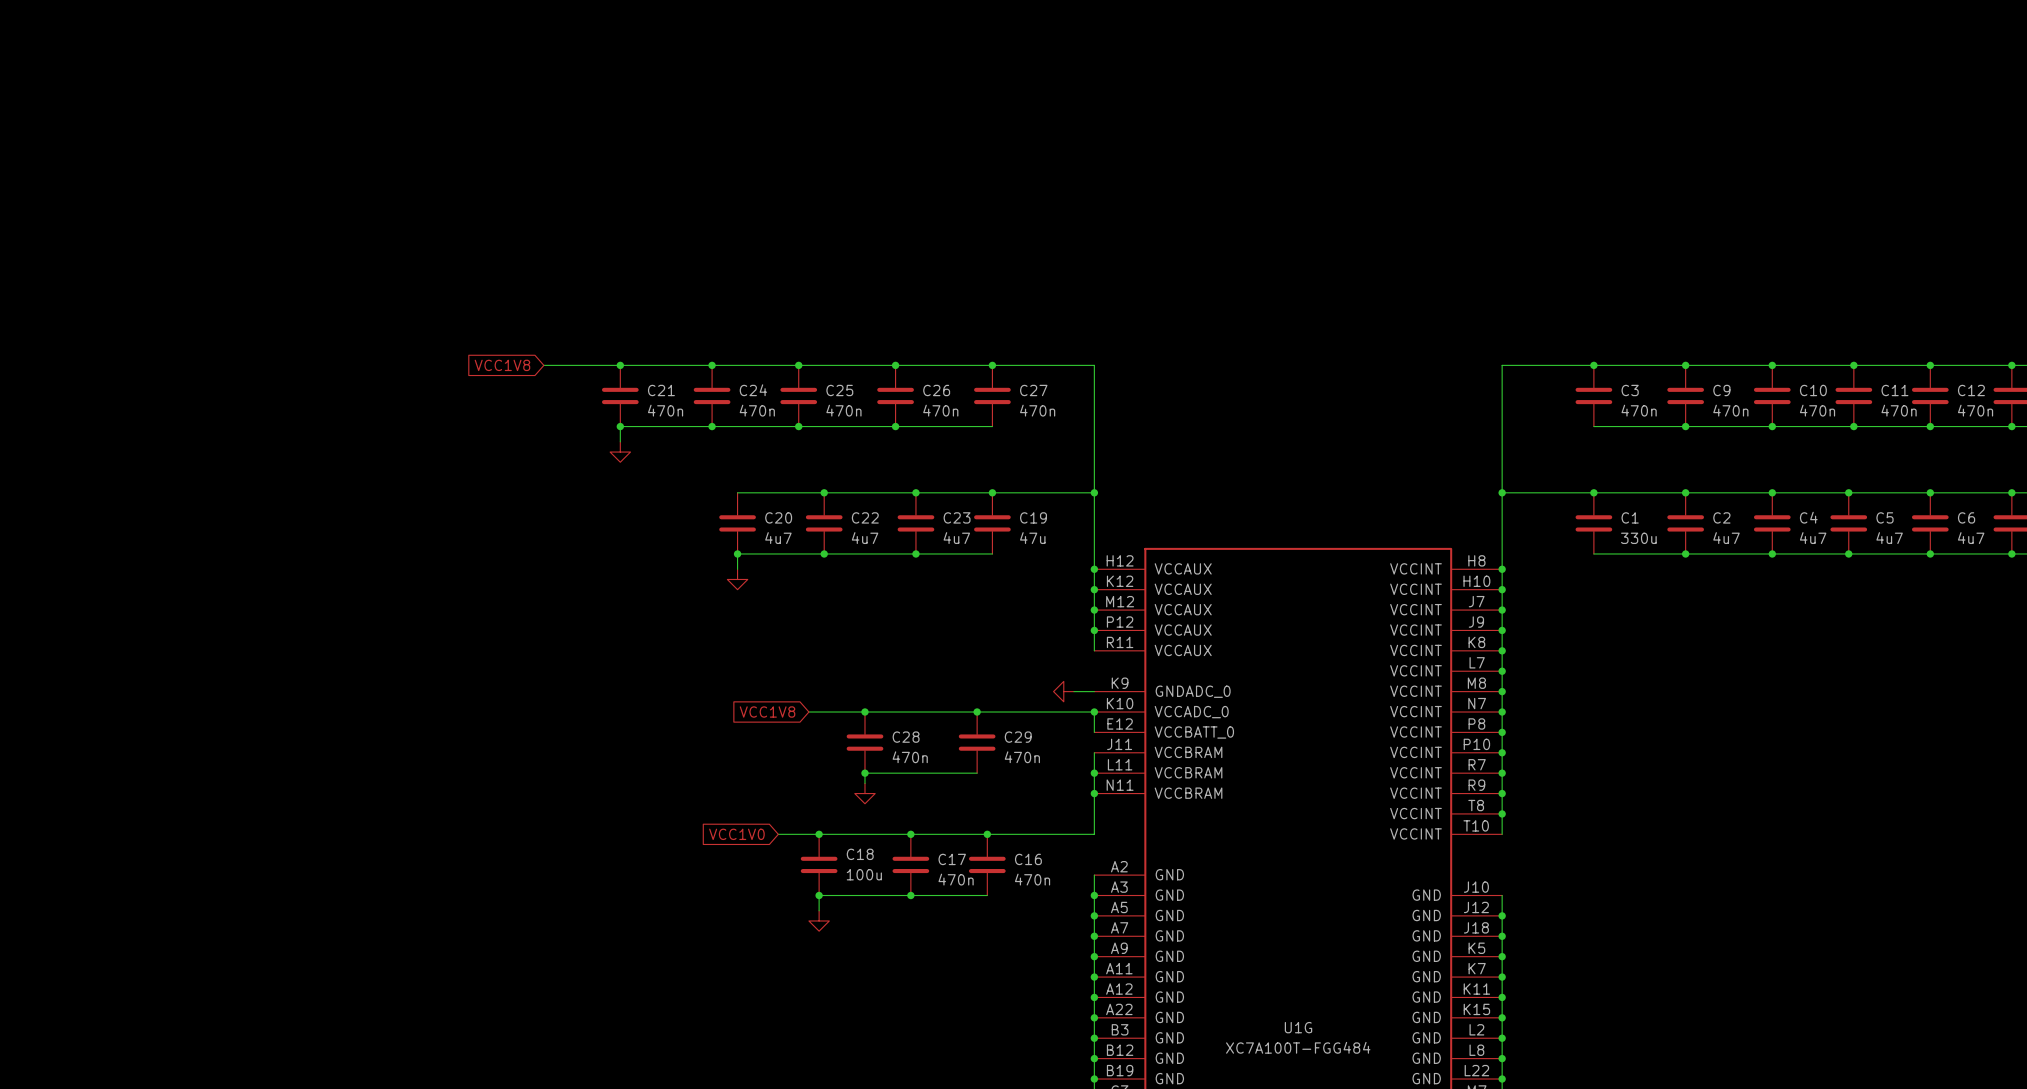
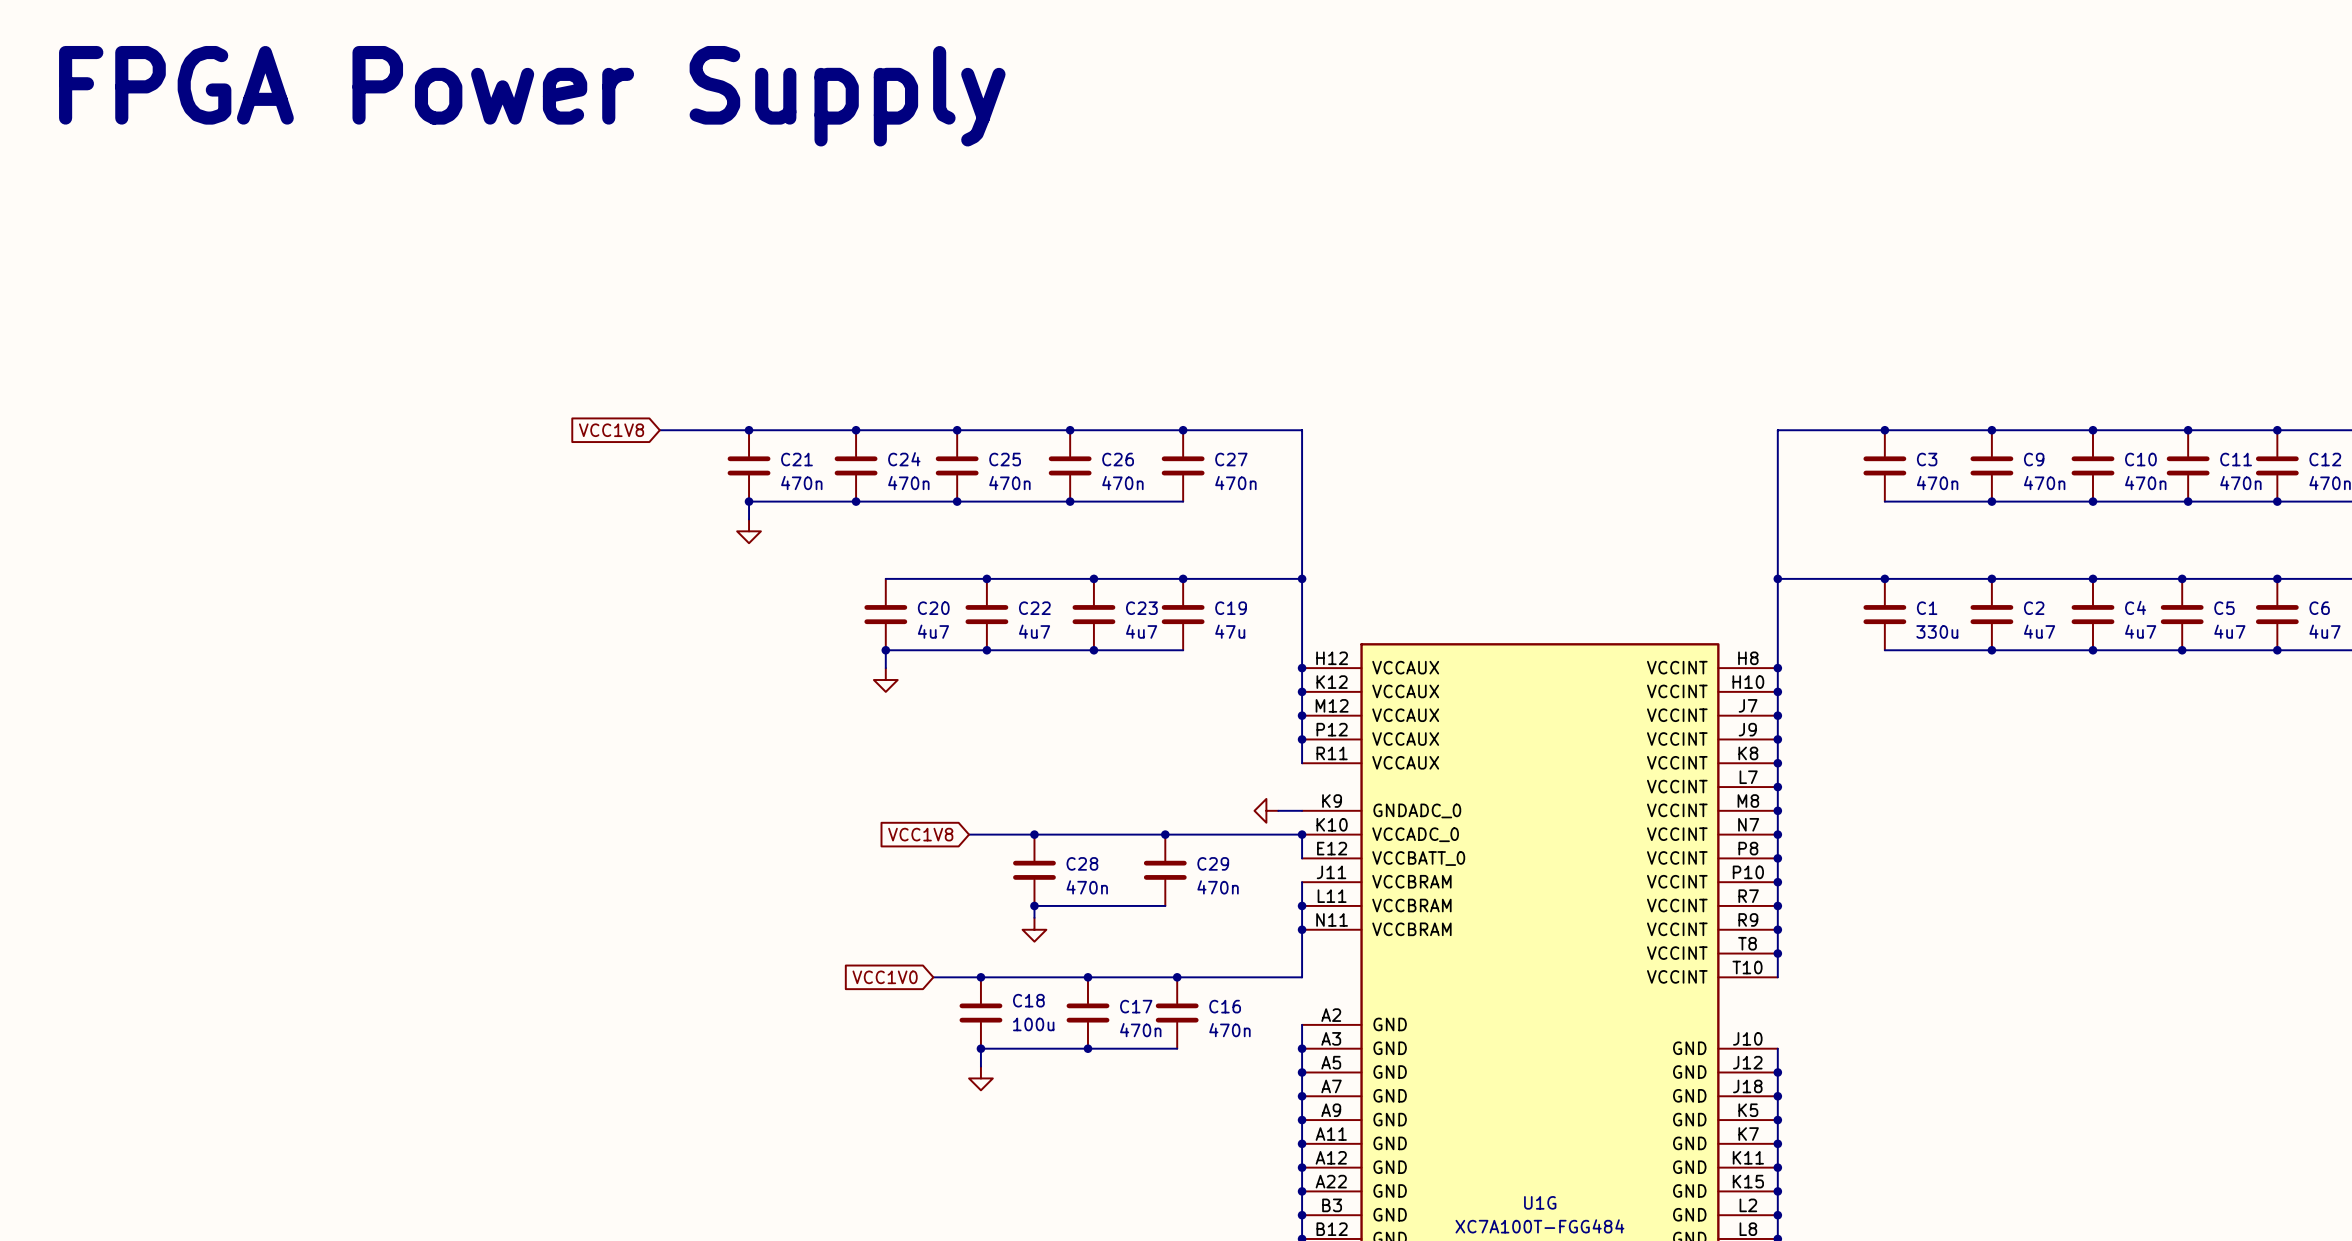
text: none -> FPGA Power Supply (532, 96)

